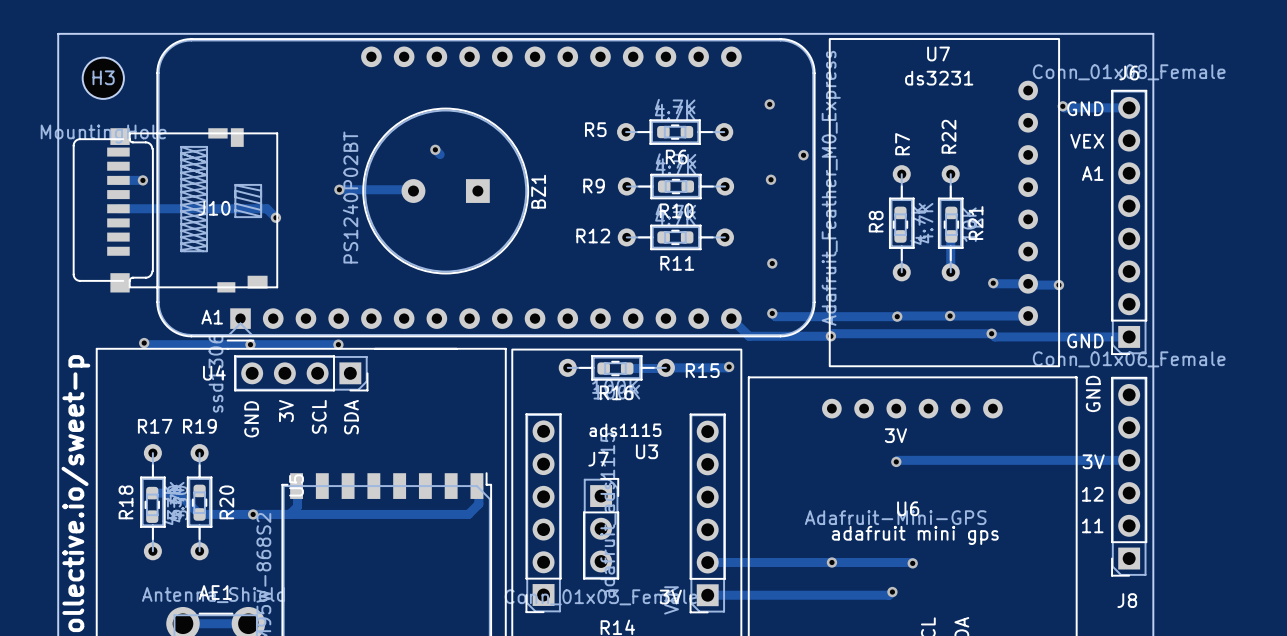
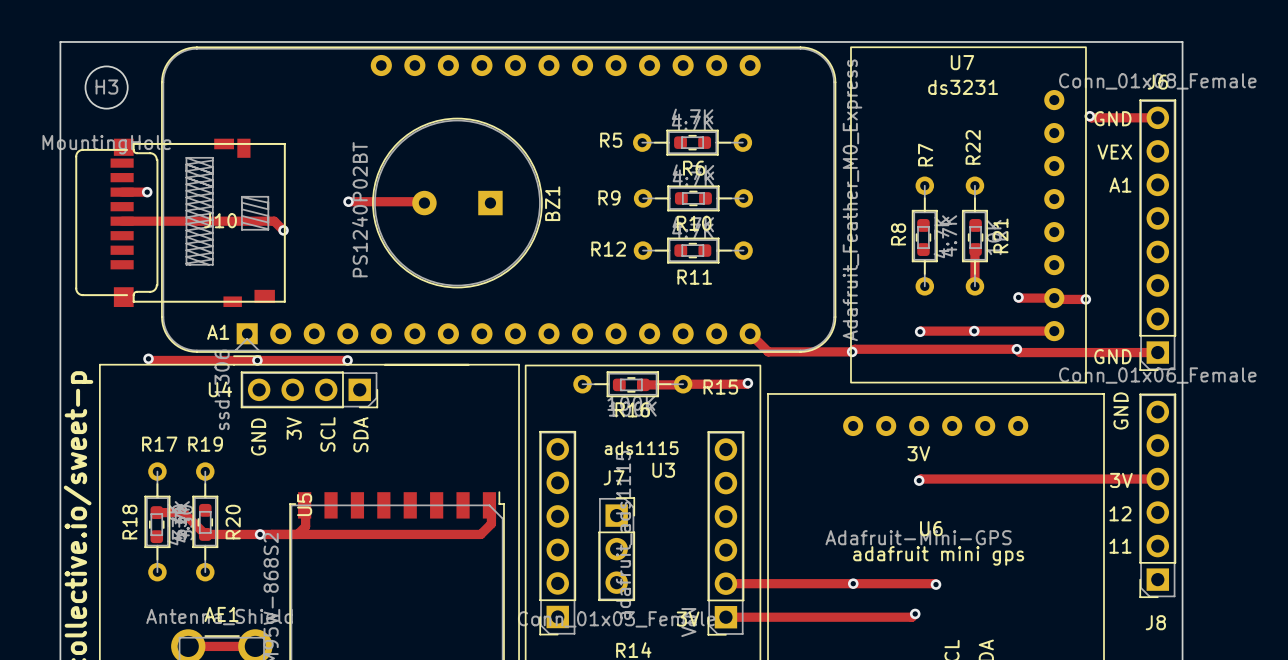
via: (769, 104) -> none
track: (435, 149) (440, 154) -> none
via: (435, 149) -> none
via: (803, 155) -> none
via: (771, 179) -> none
via: (772, 263) -> none
track: (772, 313) (775, 316) (897, 316) -> none
via: (772, 313) -> none

